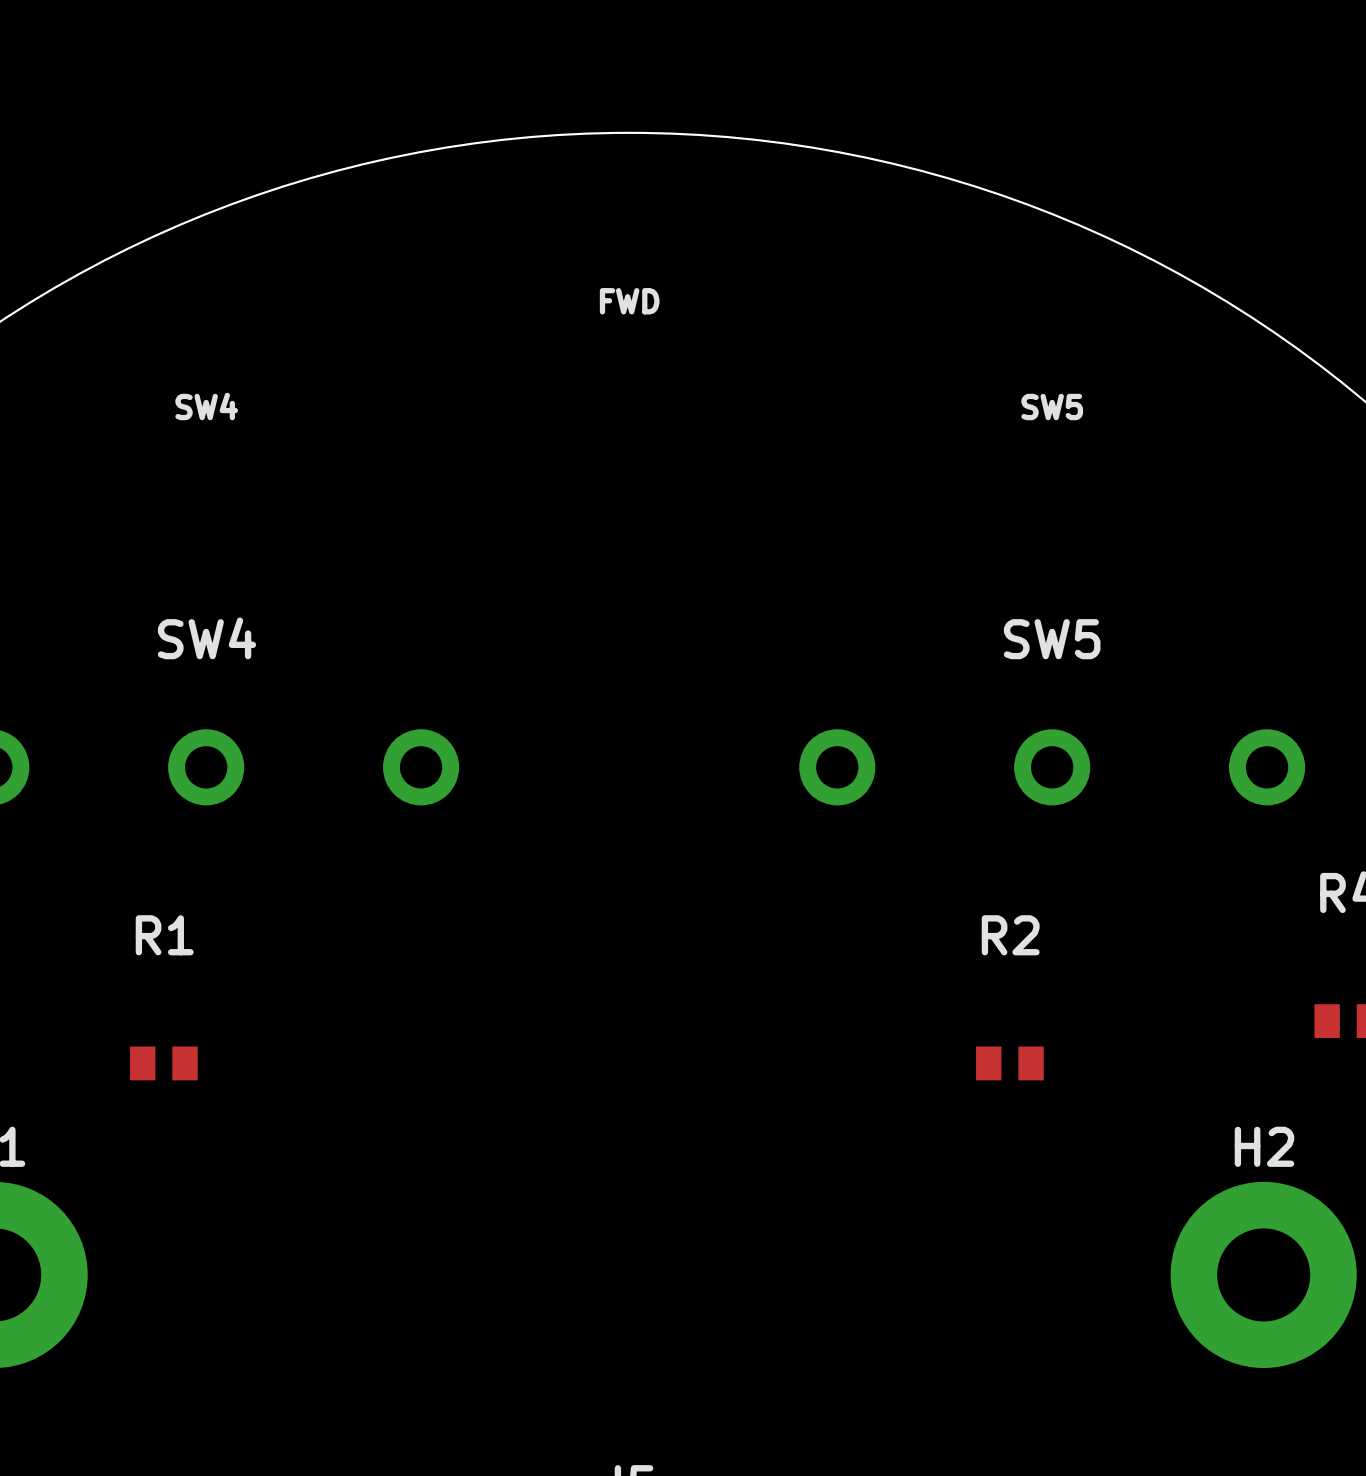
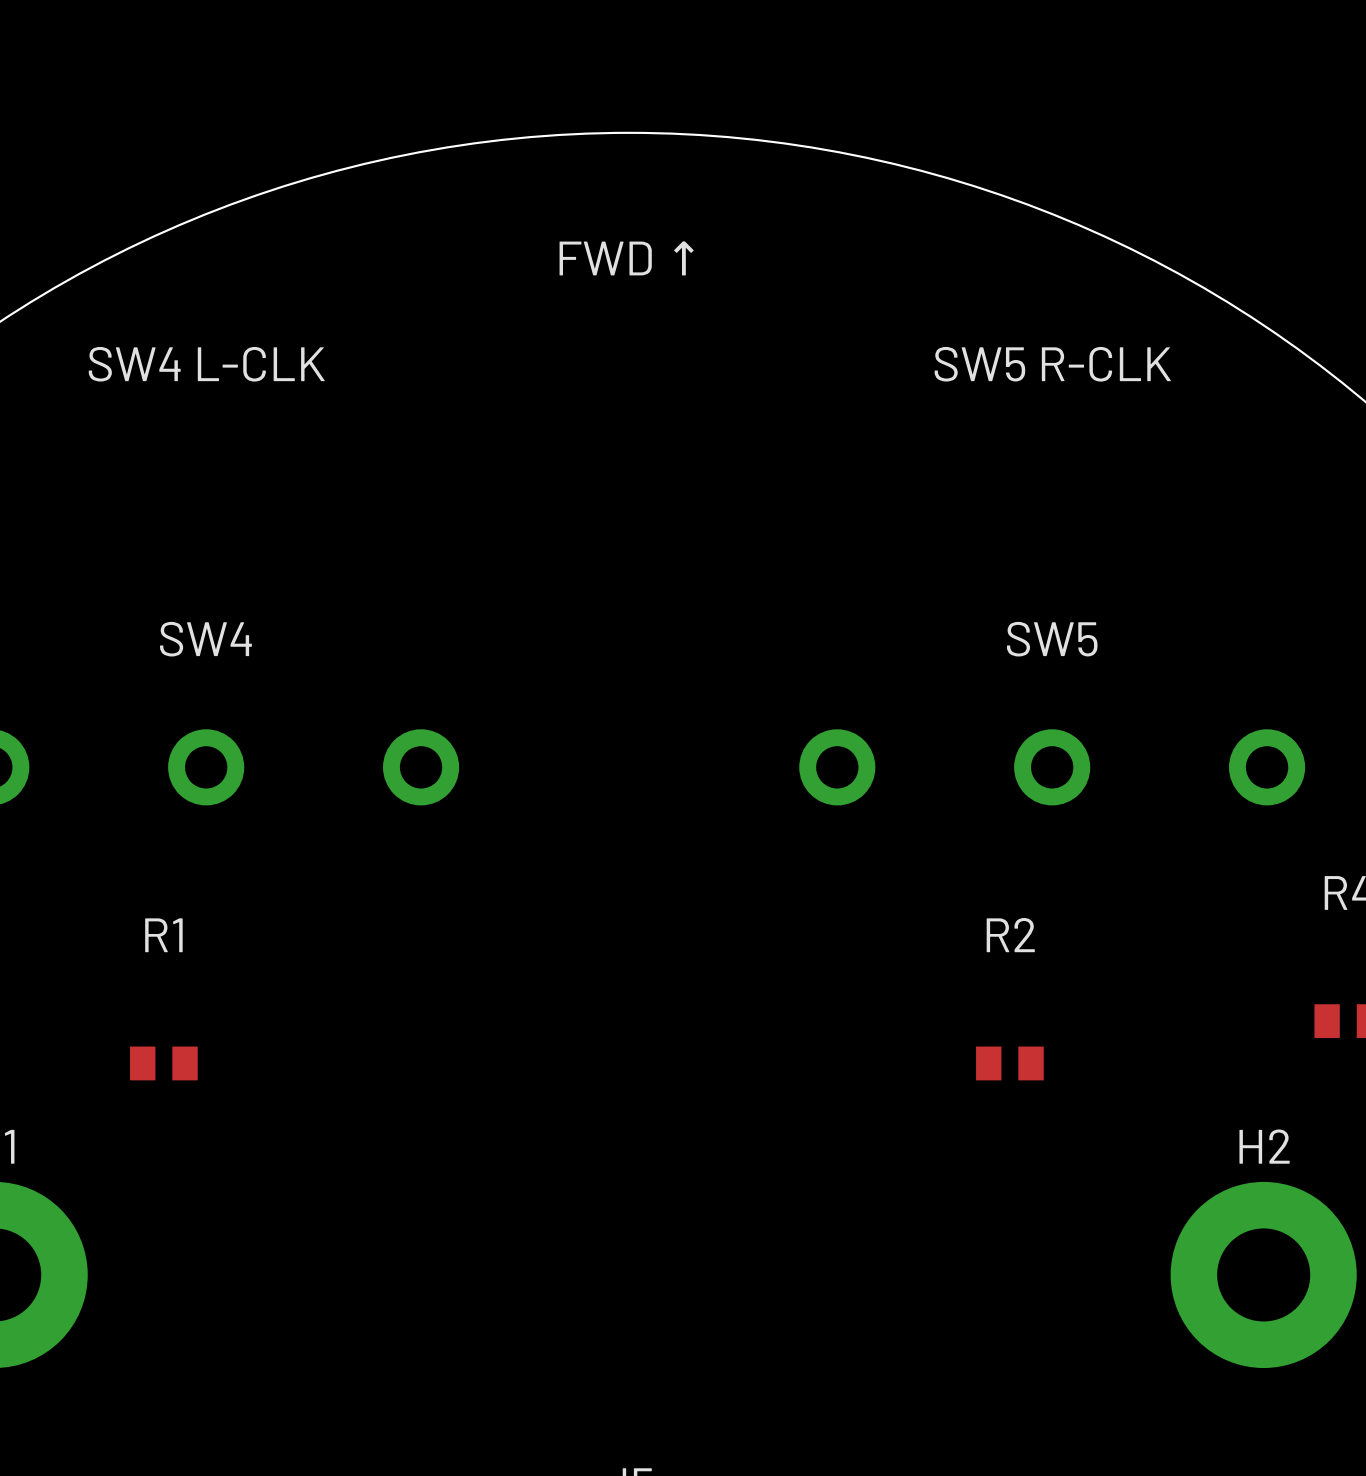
text: FWD (629, 301) -> FWD ↑ (626, 258)
text: SW4 (206, 406) -> SW4 L-CLK (206, 364)
text: SW5 (1052, 407) -> SW5 R-CLK (1052, 364)

